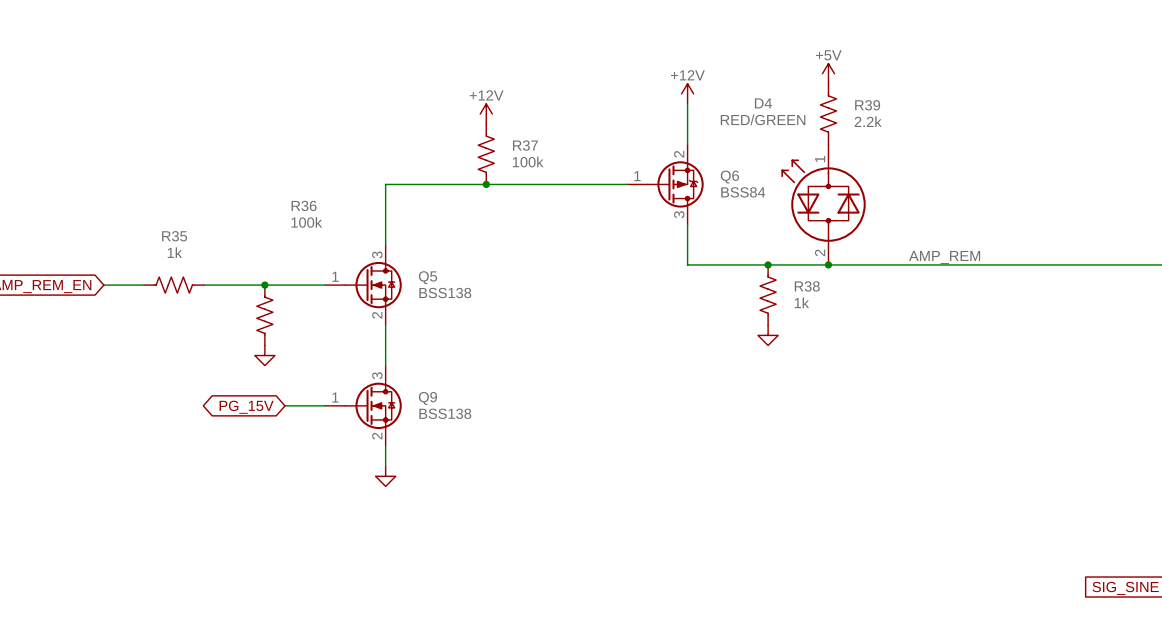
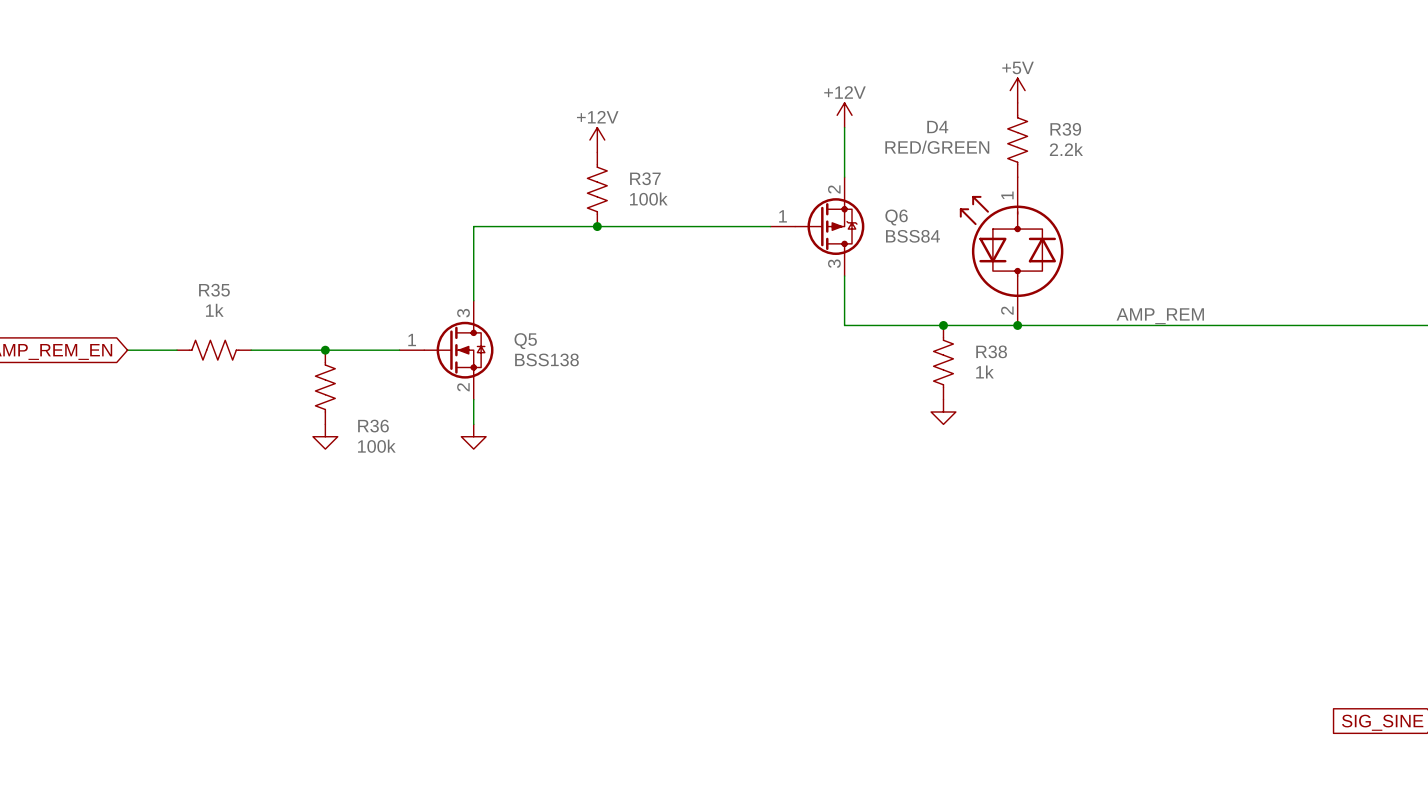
R36 name position: R36 (304, 205) -> R36 (373, 426)
R36 value position: 100k (306, 222) -> 100k (376, 446)
wire: (285, 405) (325, 405) -> none
Q9: BSS138 (363, 405) -> none
global label: PG_15V (246, 407) -> none
wire: (385, 446) (385, 466) -> none
power symbol position: (385, 476) -> (473, 436)

